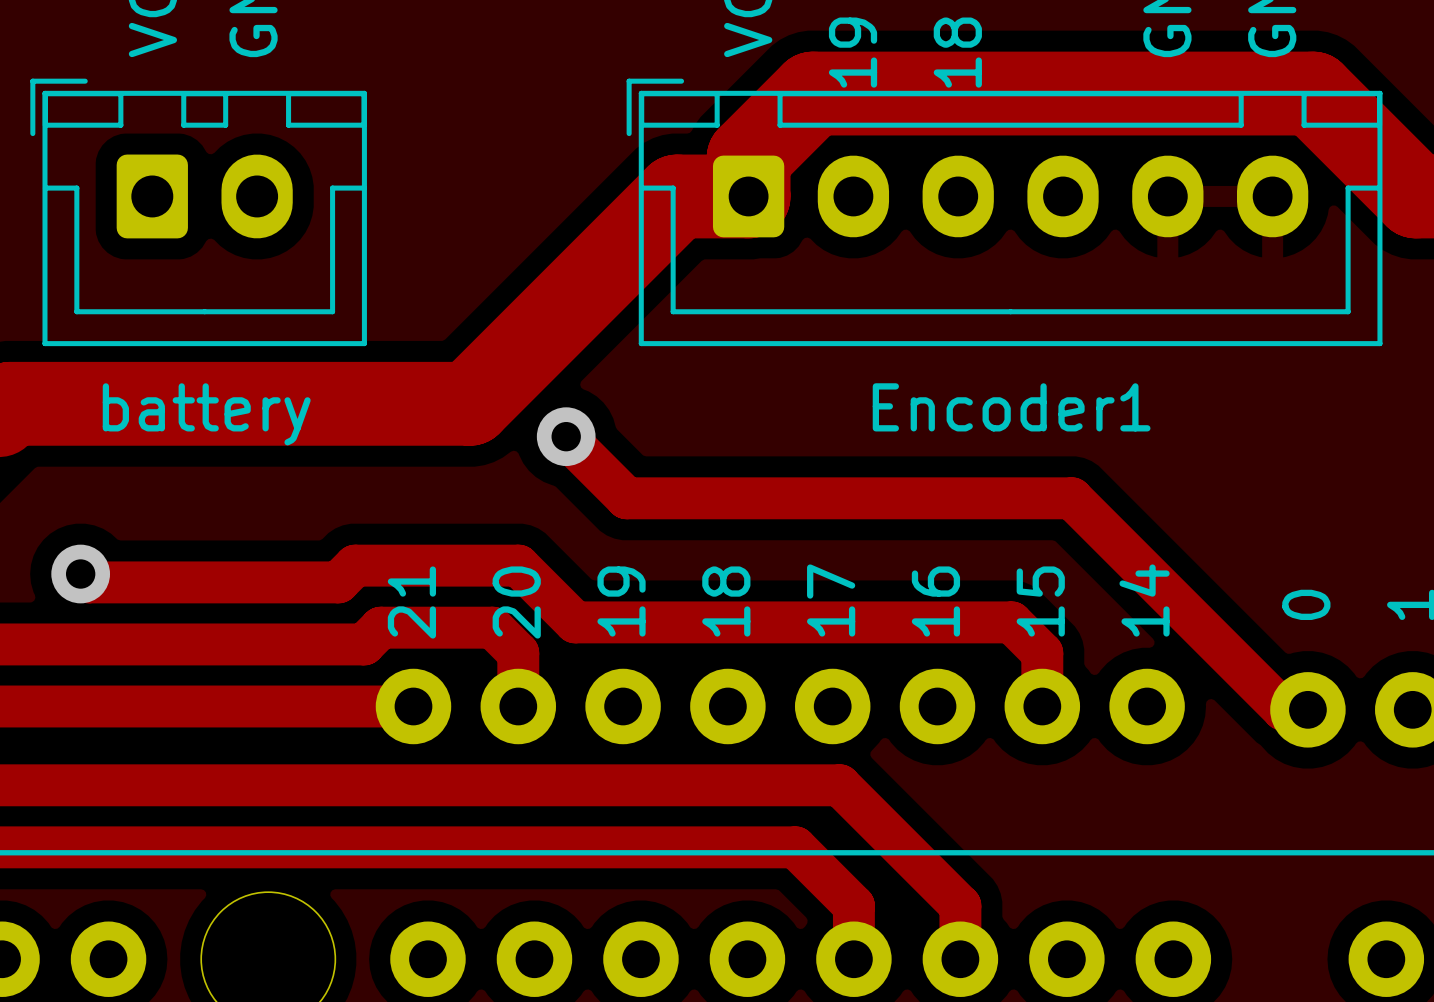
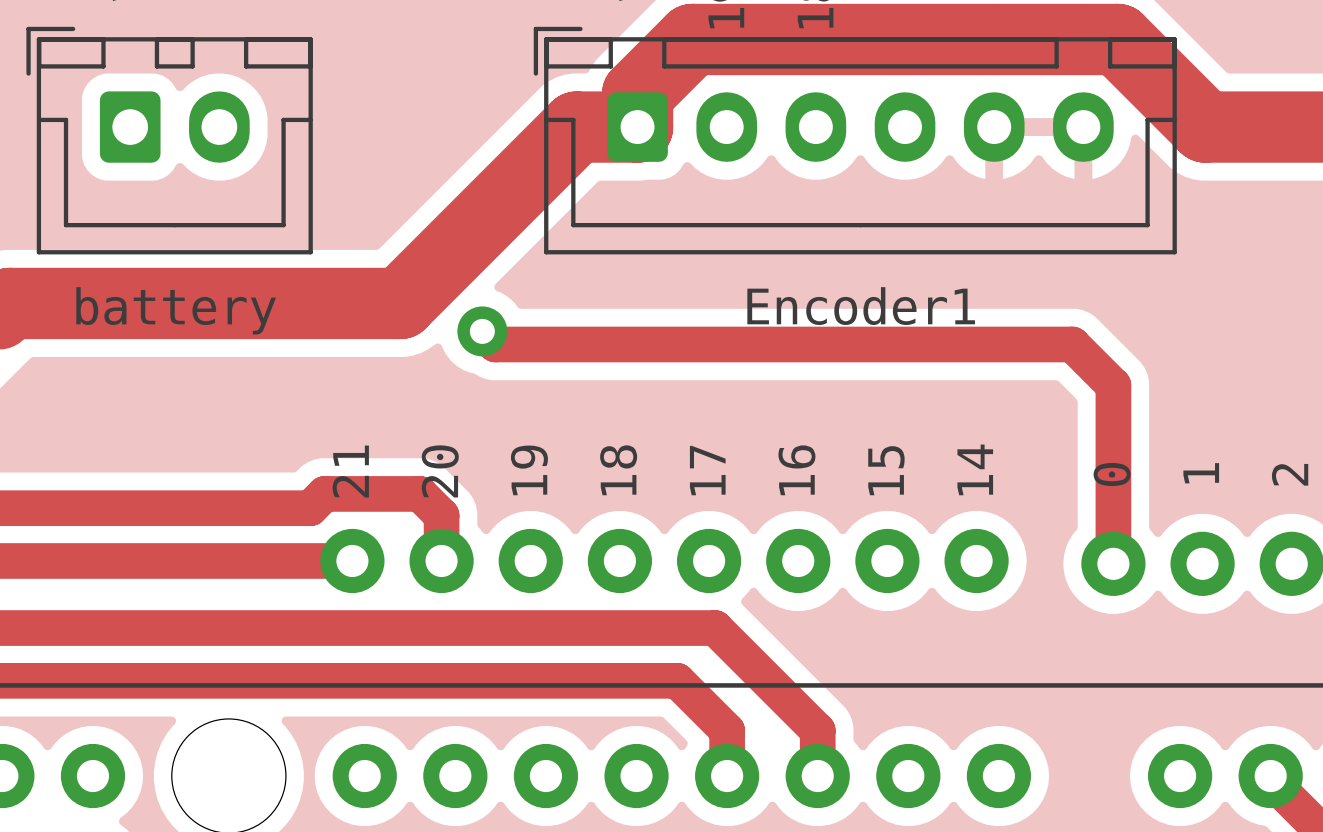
track: (566, 436) (626, 498) (1071, 498) (1283, 709) (1307, 709) -> (482, 331) (495, 344) (1072, 344) (1113, 385) (1113, 563)
track: (80, 574) (89, 582) (338, 582) (355, 565) (518, 565) (575, 622) (1011, 622) (1042, 653) (1042, 706) -> none
via: (80, 574) -> none

